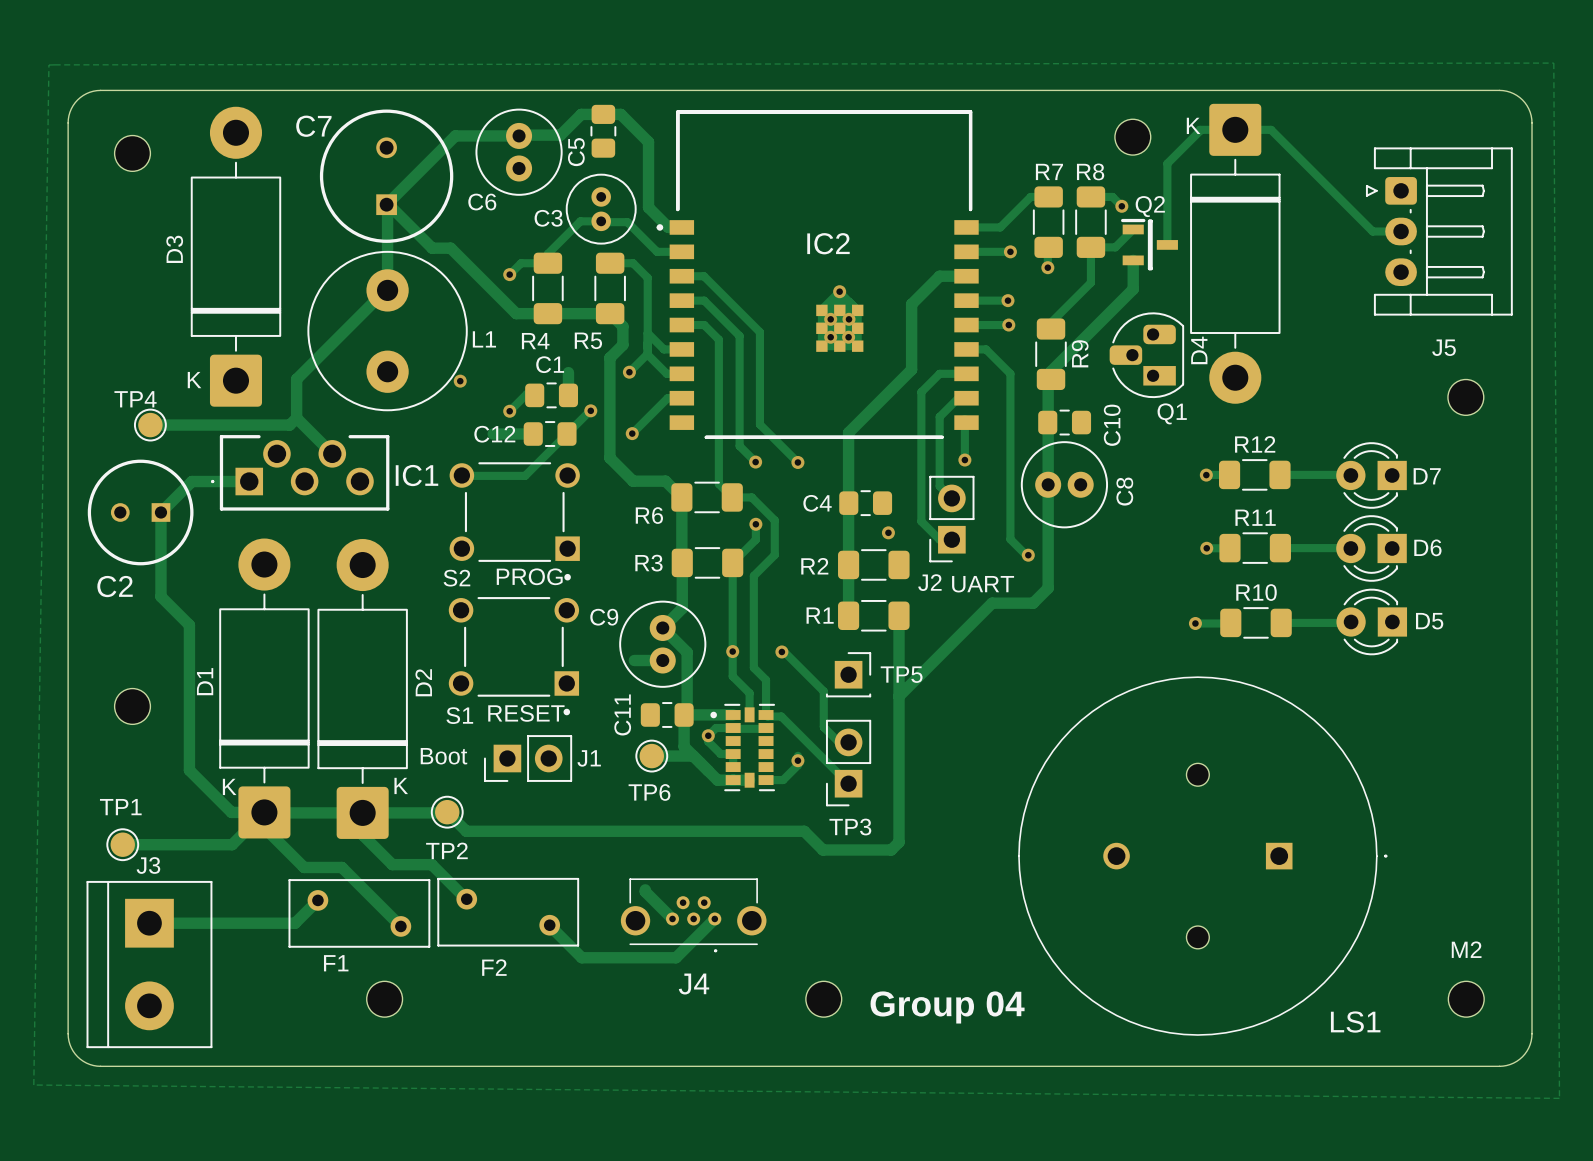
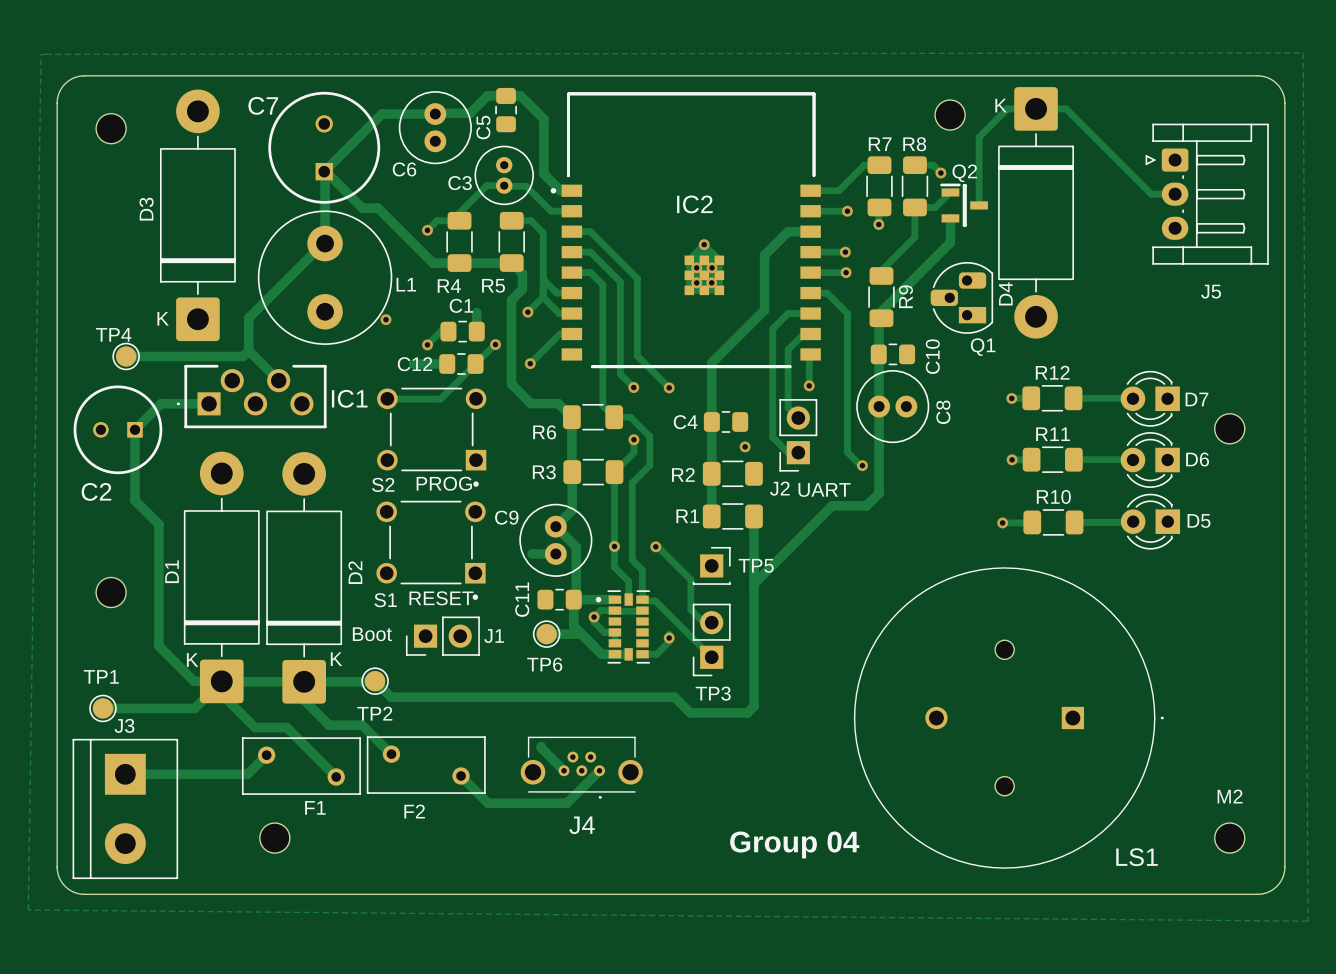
part position: (1465, 397) -> (1229, 428)
F1 name position: F1 (336, 963) -> F1 (315, 807)
part position: (384, 999) -> (274, 838)
part: (823, 999) -> none

